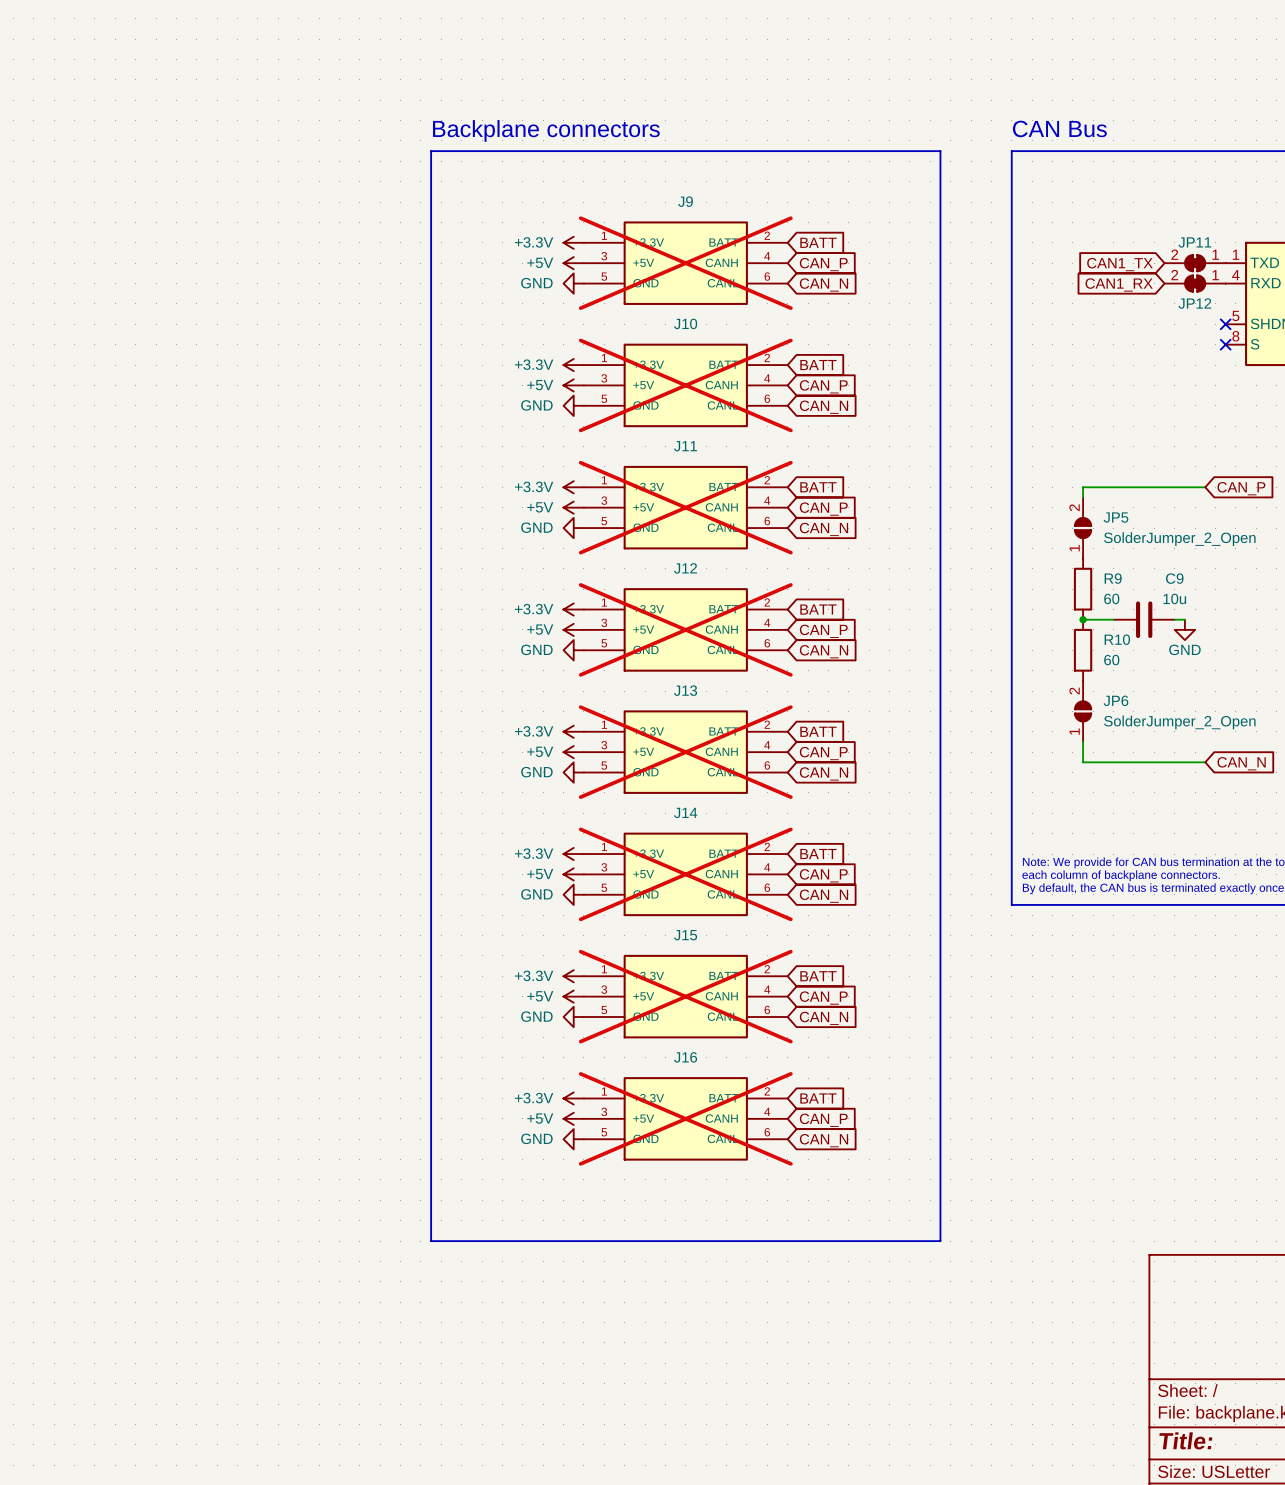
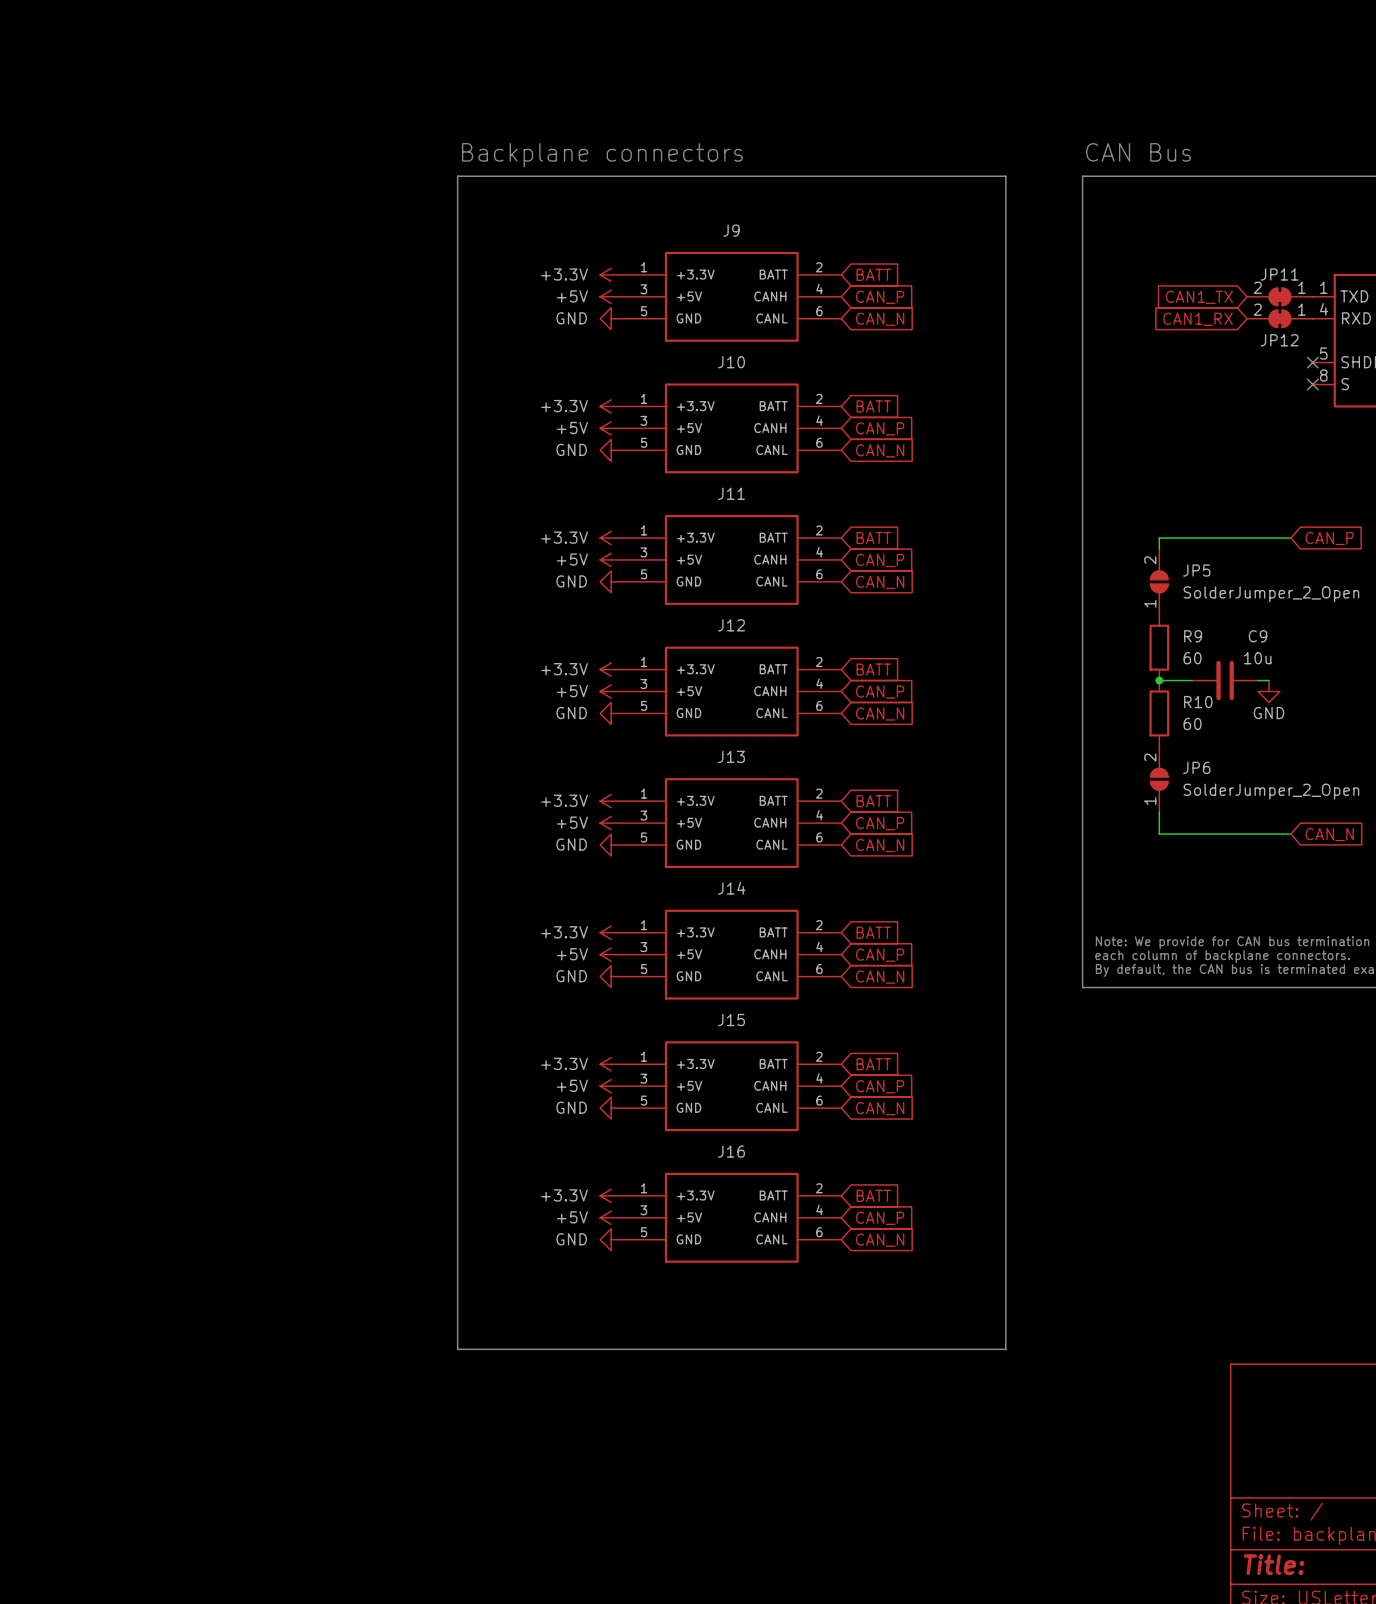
J9 do-not-place cross: (685, 263) -> none
J10 do-not-place cross: (685, 385) -> none
J11 do-not-place cross: (685, 507) -> none
J12 do-not-place cross: (685, 629) -> none
J13 do-not-place cross: (685, 752) -> none
J14 do-not-place cross: (685, 874) -> none
J15 do-not-place cross: (685, 996) -> none
J16 do-not-place cross: (685, 1118) -> none

